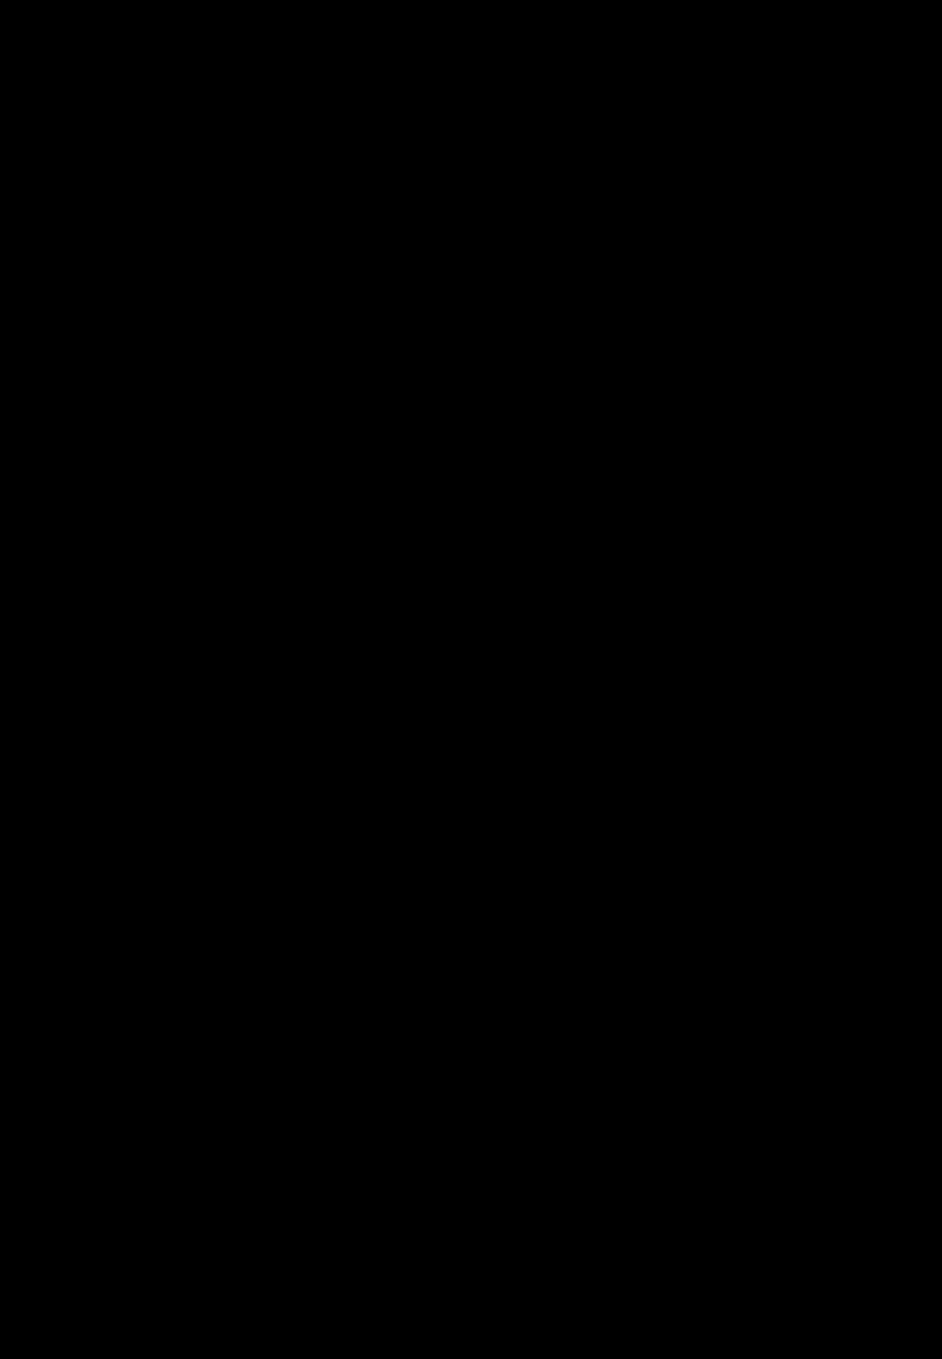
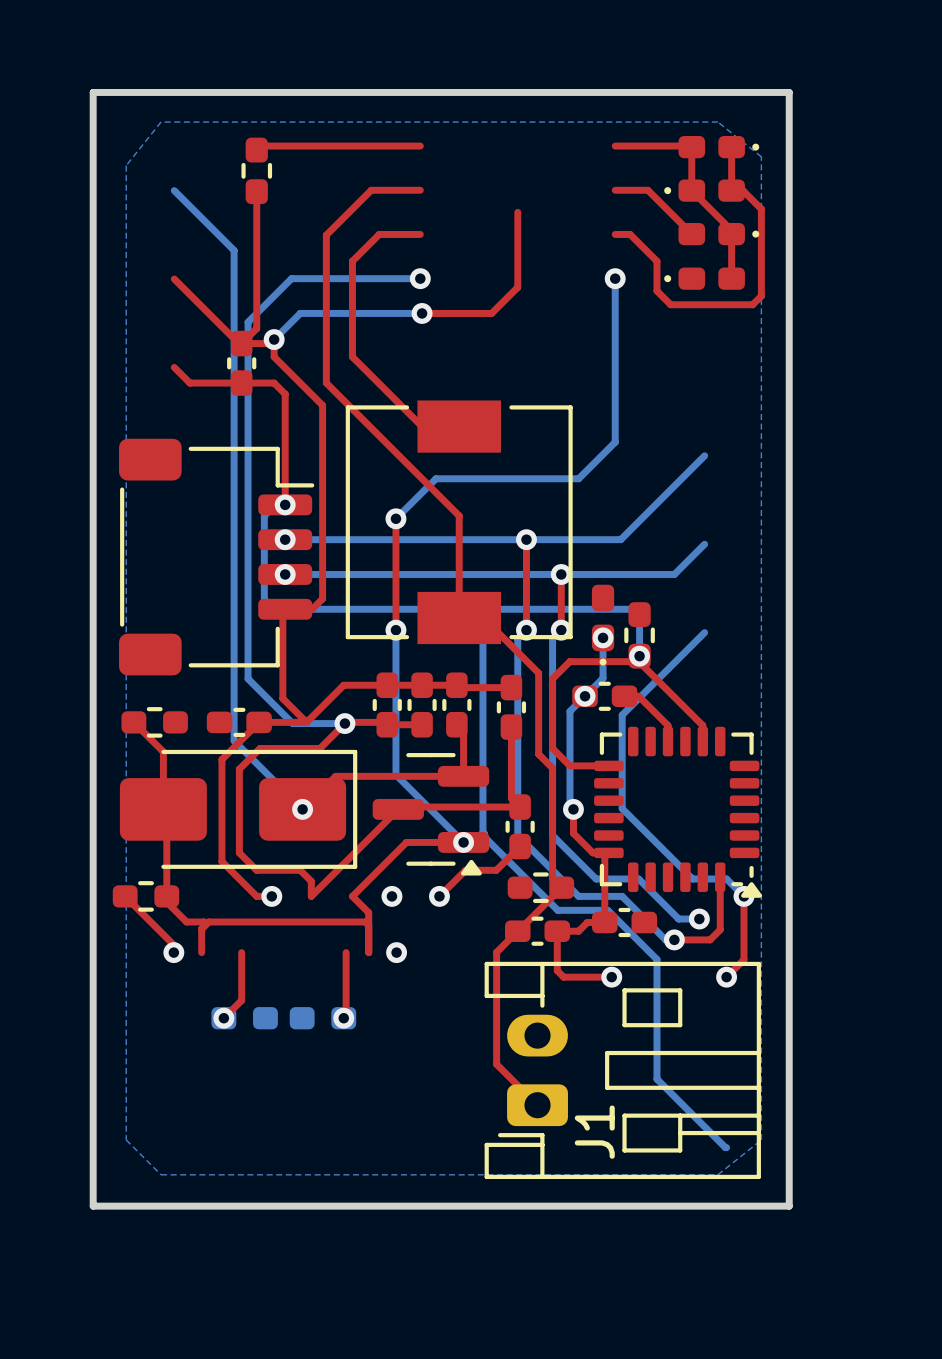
board edge: none -> (93, 92) (789, 92) (789, 1206) (93, 1206) (93, 92)
bottom zone outline: none -> (161, 122) (126, 165) (126, 1140) (161, 1174) (717, 1174) (761, 1140) (761, 156) (717, 122) (161, 122)
top track: none -> (420, 146) (260, 146) (256, 150)
top track: none -> (615, 146) (691, 147) (691, 190) (731, 230) (731, 278)
part: none -> (718, 147)
top track: none -> (731, 147) (731, 190) (742, 190) (761, 209) (761, 296) (752, 304) (670, 304) (656, 291) (656, 261) (630, 234) (615, 234)
part: none -> (256, 170)
bottom track: none -> (174, 190) (234, 250) (234, 740) (302, 809)
top track: none -> (420, 190) (371, 190) (326, 235) (326, 383) (459, 515) (459, 617) (483, 617) (538, 673) (538, 754) (552, 768) (552, 878) (561, 887) (496, 952) (496, 1064) (537, 1105)
top track: none -> (615, 190) (647, 190) (691, 234)
part: none -> (704, 190)
top track: none -> (256, 191) (256, 328) (241, 343)
top track: none -> (517, 212) (517, 287) (491, 313) (422, 313)
top track: none -> (420, 234) (379, 234) (352, 261) (352, 356) (422, 426) (459, 426)
part: none -> (718, 234)
bottom track: none -> (420, 278) (291, 278) (248, 322) (248, 678) (292, 723) (344, 723)
via: none -> (420, 278)
bottom track: none -> (615, 278) (615, 442) (578, 478) (435, 478) (395, 518)
via: none -> (615, 278)
part: none -> (704, 278)
top track: none -> (174, 279) (238, 343) (270, 343) (274, 339) (274, 356) (322, 405) (322, 598) (312, 609) (285, 609) (282, 611) (282, 698) (306, 722)
bottom track: none -> (422, 313) (300, 313) (274, 339)
via: none -> (422, 313)
via: none -> (274, 339)
part: none -> (241, 363)
top track: none -> (174, 367) (189, 383) (274, 383) (285, 394) (285, 504)
bottom track: none -> (704, 455) (620, 539) (285, 539)
bottom track: none -> (285, 504) (275, 504) (264, 515) (264, 599) (274, 609) (630, 609) (639, 617) (639, 656)
via: none -> (285, 504)
top track: none -> (395, 518) (395, 630)
via: none -> (395, 518)
part: none -> (459, 522)
via: none -> (285, 539)
top track: none -> (526, 539) (526, 630)
via: none -> (526, 539)
bottom track: none -> (704, 544) (674, 574) (285, 574)
part: none -> (216, 557)
via: none -> (285, 574)
top track: none -> (561, 574) (561, 630)
via: none -> (561, 574)
bottom track: none -> (474, 609) (482, 617) (484, 836) (557, 910) (607, 910) (656, 959) (656, 1079) (726, 1147)
part: none -> (603, 625)
bottom track: none -> (395, 630) (395, 774) (463, 842)
via: none -> (395, 630)
bottom track: none -> (526, 630) (517, 638) (517, 835) (578, 896) (622, 896) (665, 939) (674, 939)
via: none -> (526, 630)
bottom track: none -> (561, 630) (552, 638) (552, 835) (596, 879) (638, 879) (678, 919) (699, 919)
via: none -> (561, 630)
bottom track: none -> (704, 632) (622, 715) (622, 808) (692, 879) (726, 879) (743, 896)
part: none -> (639, 635)
bottom track: none -> (603, 637) (603, 678) (569, 711) (569, 805) (573, 809)
via: none -> (603, 637)
via: none -> (639, 656)
top track: none -> (511, 687) (459, 687) (456, 685) (343, 685) (306, 722)
via: none -> (585, 696)
part: none -> (604, 696)
top track: none -> (624, 696) (638, 696) (668, 725) (668, 741)
part: none -> (387, 704)
part: none -> (422, 704)
part: none -> (456, 704)
part: none -> (511, 707)
top track: none -> (133, 722) (163, 751) (163, 809) (166, 812) (166, 902) (186, 921) (204, 921) (206, 924)
part: none -> (154, 722)
part: none -> (239, 722)
top track: none -> (306, 722) (259, 722) (221, 759) (221, 861) (256, 896) (271, 896)
via: none -> (344, 723)
top track: none -> (422, 724) (346, 722) (320, 748) (260, 748) (239, 769) (239, 852) (256, 870) (300, 870) (311, 881) (311, 896) (400, 807) (520, 807) (511, 798) (511, 727)
top track: none -> (456, 724) (463, 731) (463, 776) (335, 776) (302, 809)
top track: none -> (702, 741) (702, 725) (639, 662) (639, 656) (634, 661) (569, 661) (552, 678) (552, 748) (569, 765) (608, 765)
part: none -> (238, 809)
via: none -> (302, 809)
top track: none -> (573, 809) (573, 833) (592, 852) (608, 852) (604, 856) (604, 922) (587, 922) (578, 931) (557, 931) (557, 970) (563, 977) (611, 977)
via: none -> (573, 809)
part: none -> (678, 812)
part: none -> (430, 814)
part: none -> (520, 826)
top track: none -> (463, 842) (406, 842) (352, 896) (368, 912) (368, 952)
via: none -> (463, 842)
top track: none -> (520, 846) (496, 870) (465, 870) (439, 896)
top track: none -> (720, 877) (720, 929) (710, 939) (674, 939)
part: none -> (540, 887)
top track: none -> (125, 896) (173, 945) (173, 952)
part: none -> (146, 896)
via: none -> (271, 896)
via: none -> (391, 896)
via: none -> (439, 896)
top track: none -> (743, 896) (743, 959) (726, 977)
via: none -> (743, 896)
via: none -> (699, 919)
part: none -> (624, 922)
top track: none -> (368, 925) (365, 921) (208, 921) (201, 928) (201, 952)
part: none -> (537, 931)
via: none -> (674, 939)
via: none -> (173, 952)
top track: none -> (241, 952) (241, 1000) (223, 1018)
top track: none -> (346, 952) (346, 1015) (343, 1018)
via: none -> (396, 952)
via: none -> (611, 977)
via: none -> (726, 977)
via: none -> (223, 1018)
part: none -> (244, 1018)
part: none -> (322, 1018)
via: none -> (343, 1018)
J1: none -> (622, 1070)

